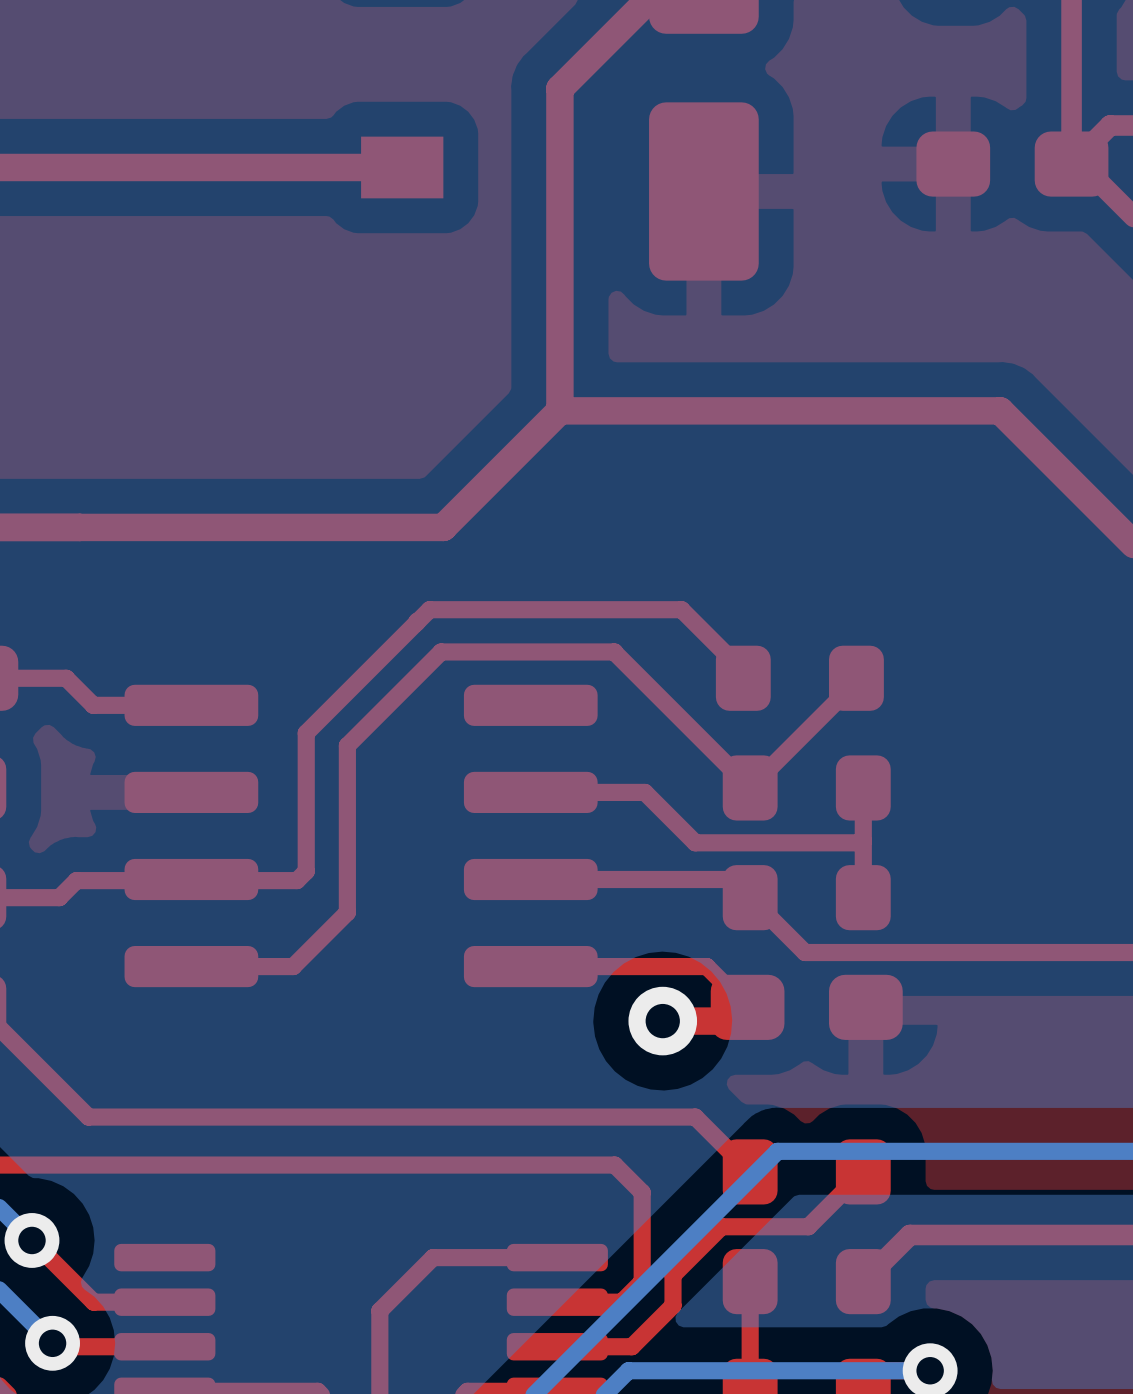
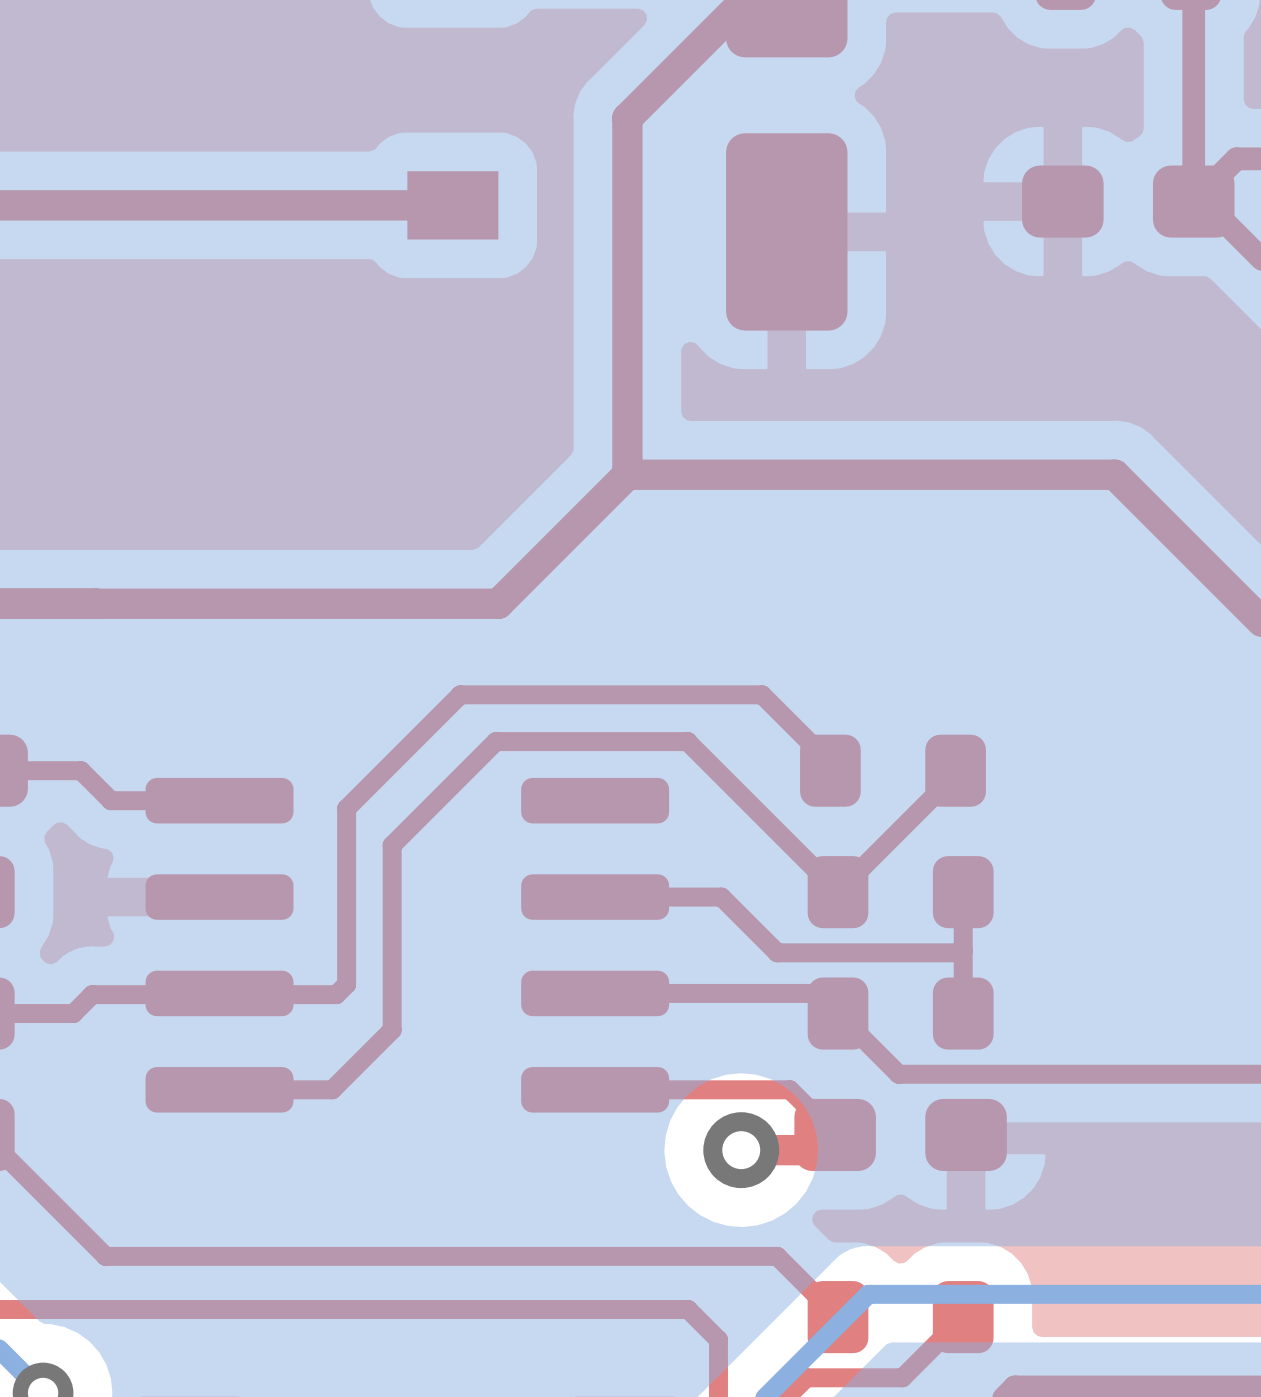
top track: (429, 609) (306, 733) -> (483, 694) (460, 694) (346, 808) (346, 831)

